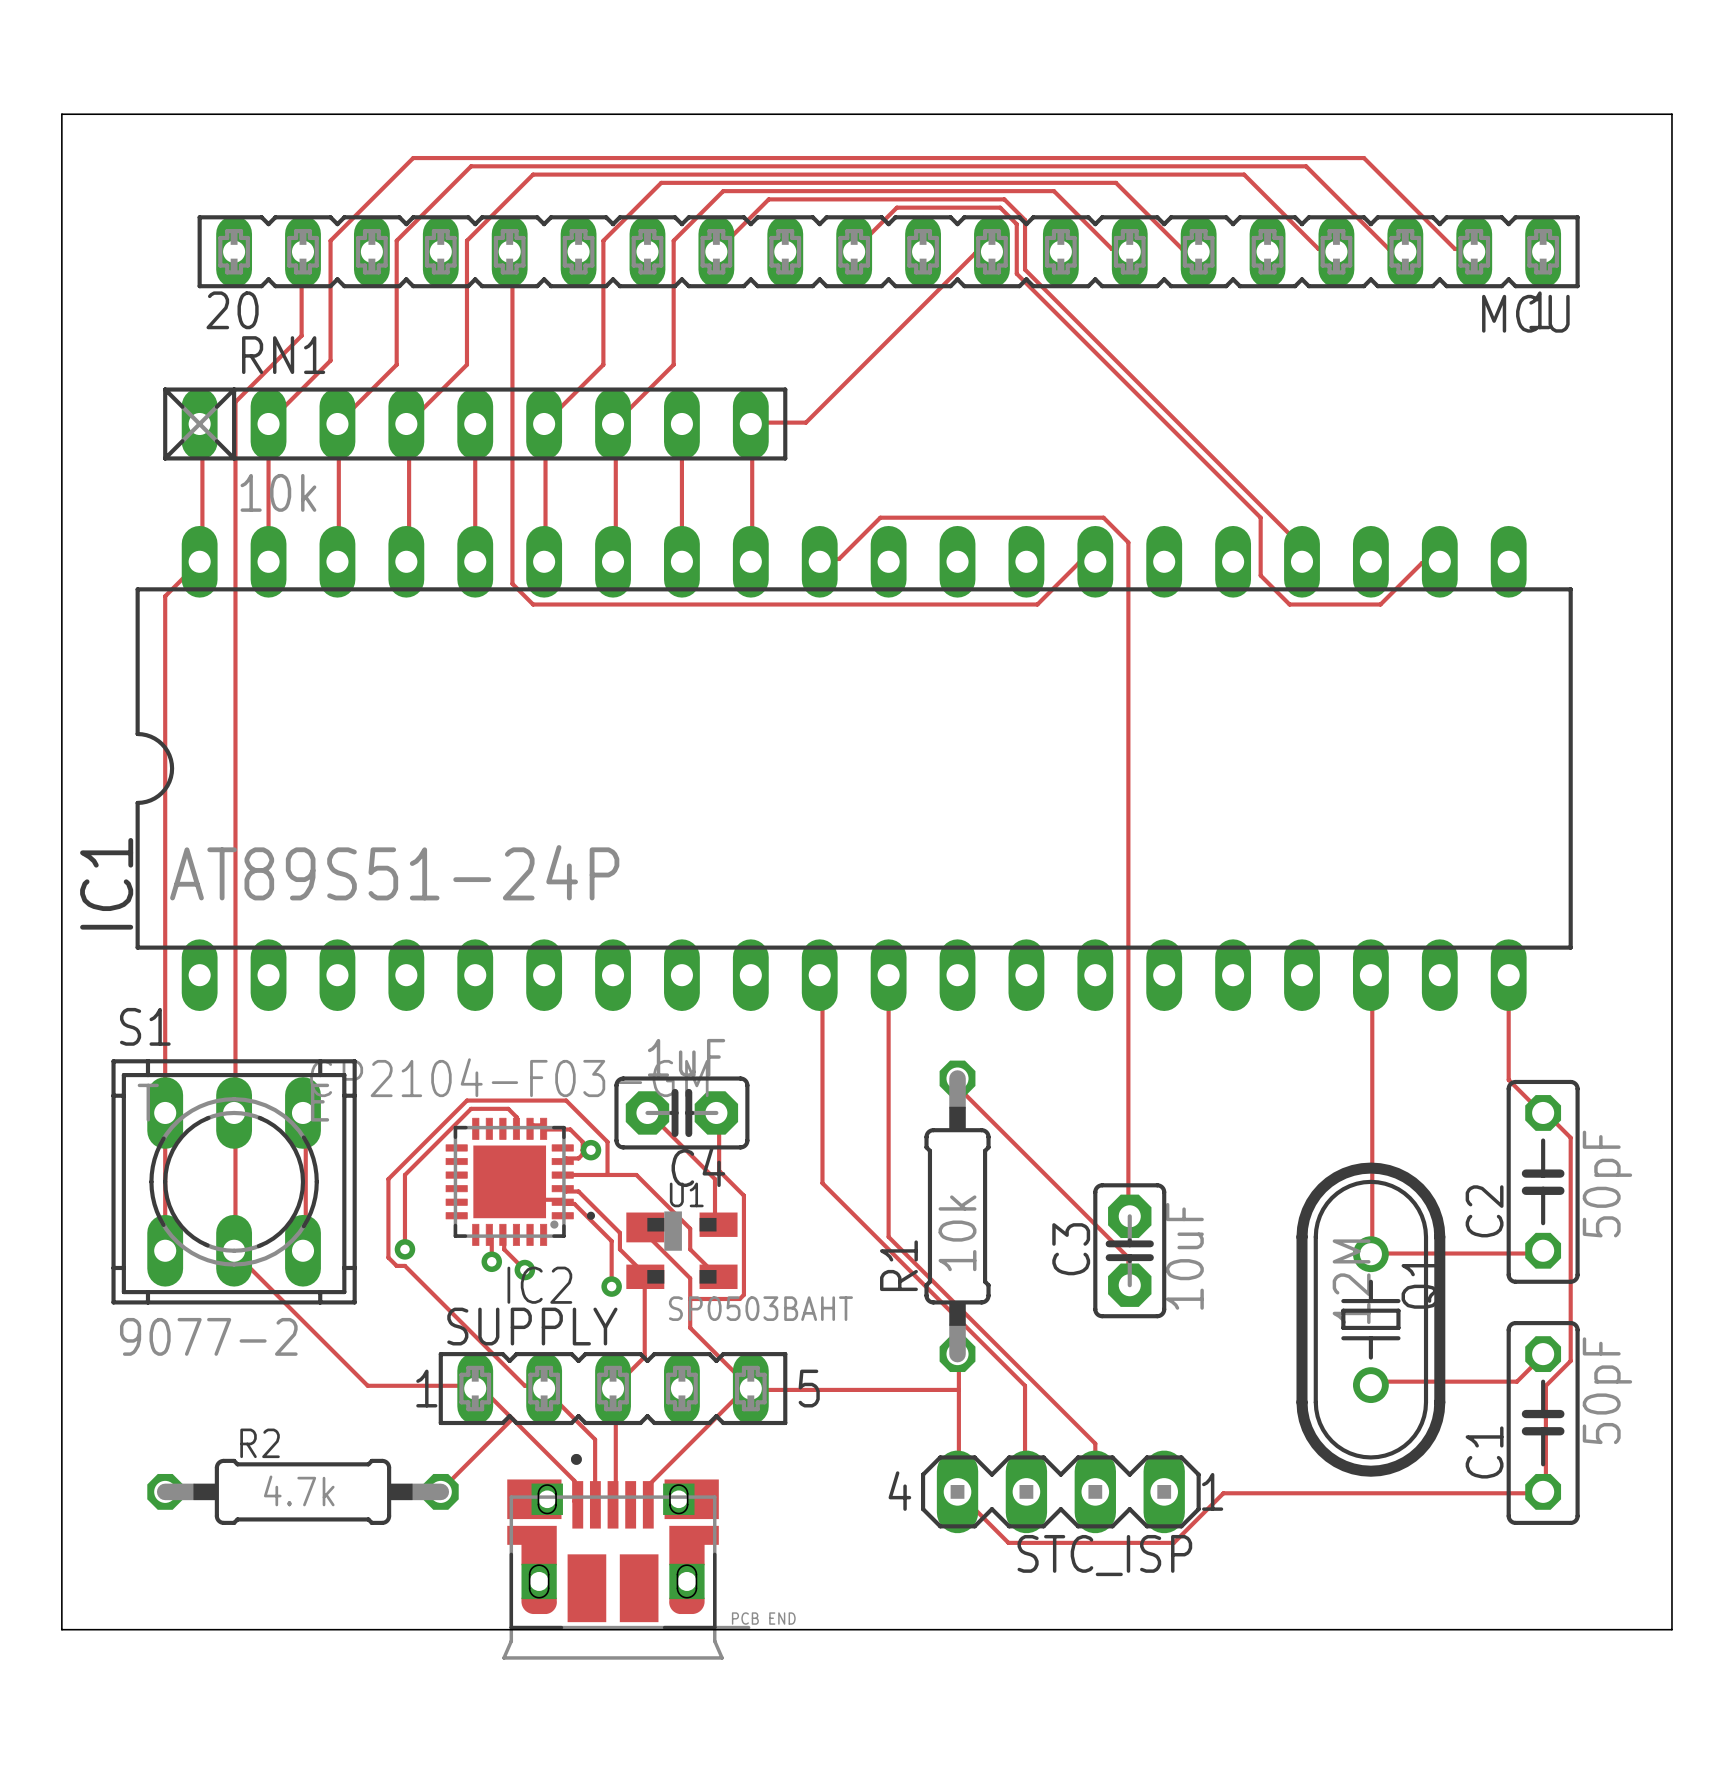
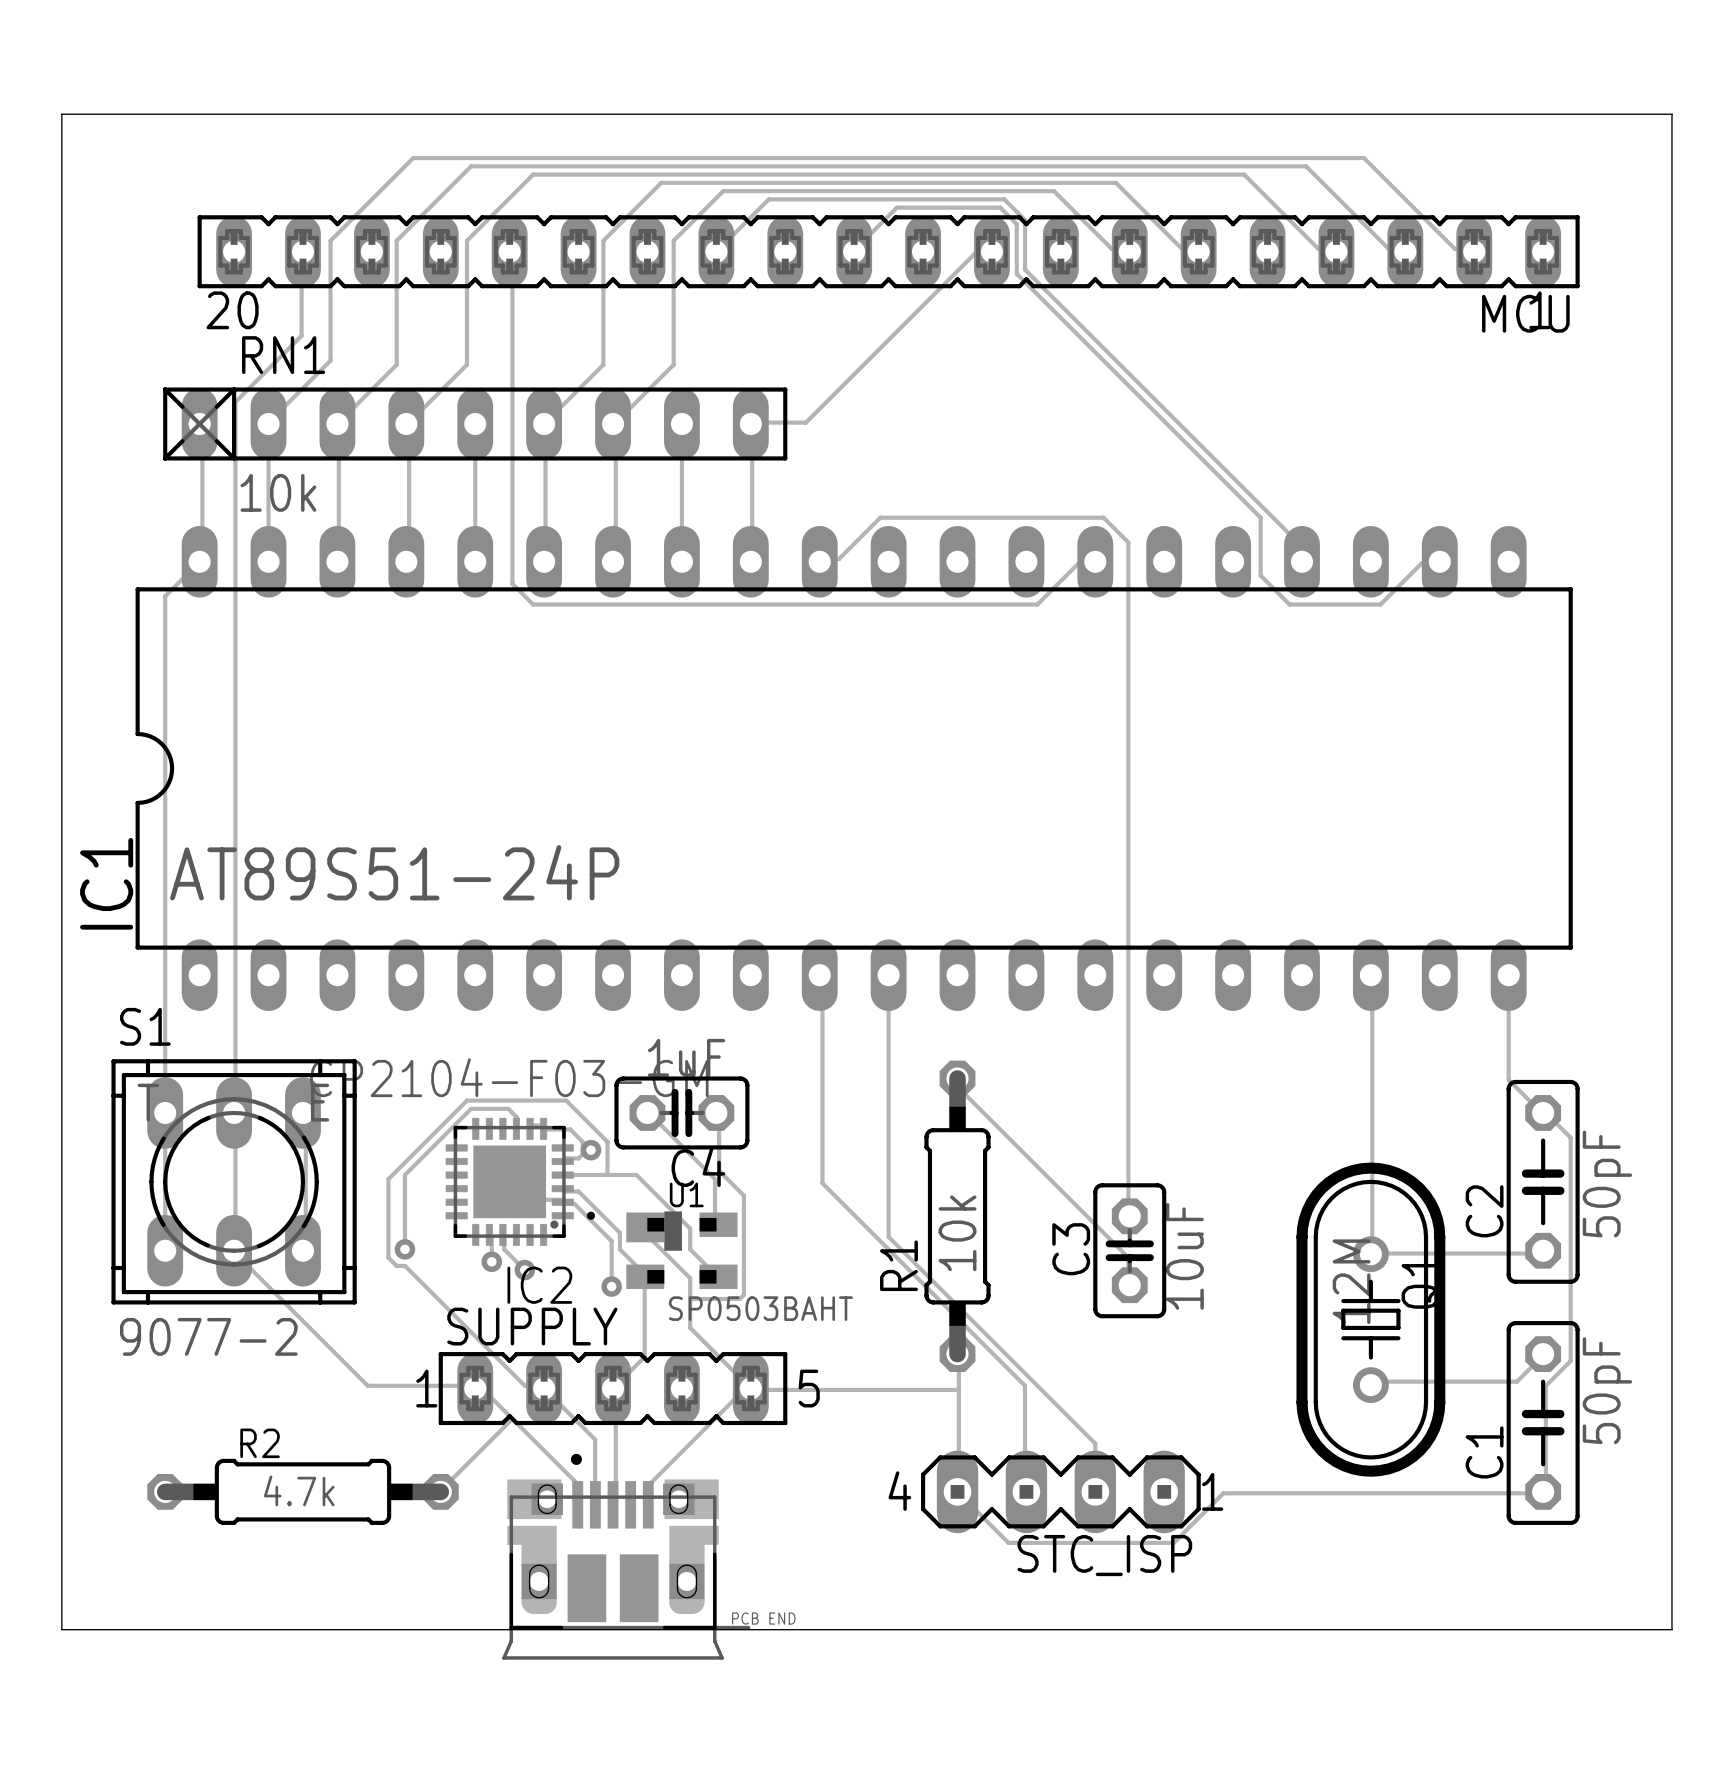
C4 footprint: [614, 1076, 750, 1150] -> [614, 1076, 750, 1150]
C3 footprint: [1093, 1183, 1167, 1319] -> [1093, 1183, 1167, 1319]

